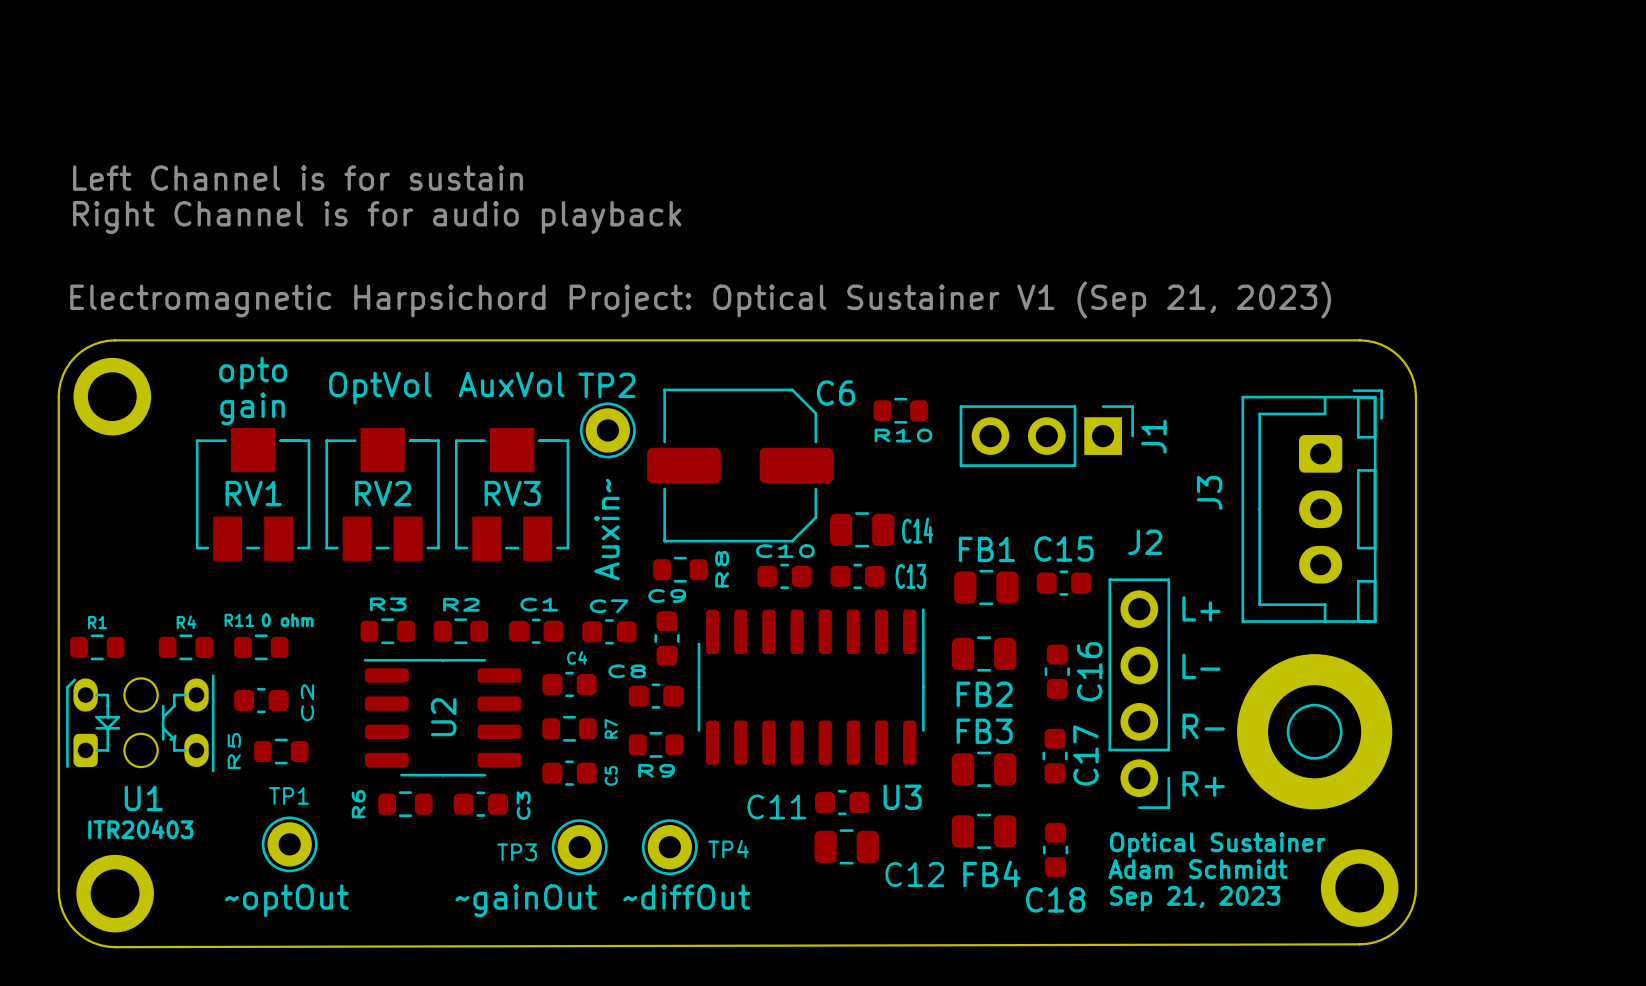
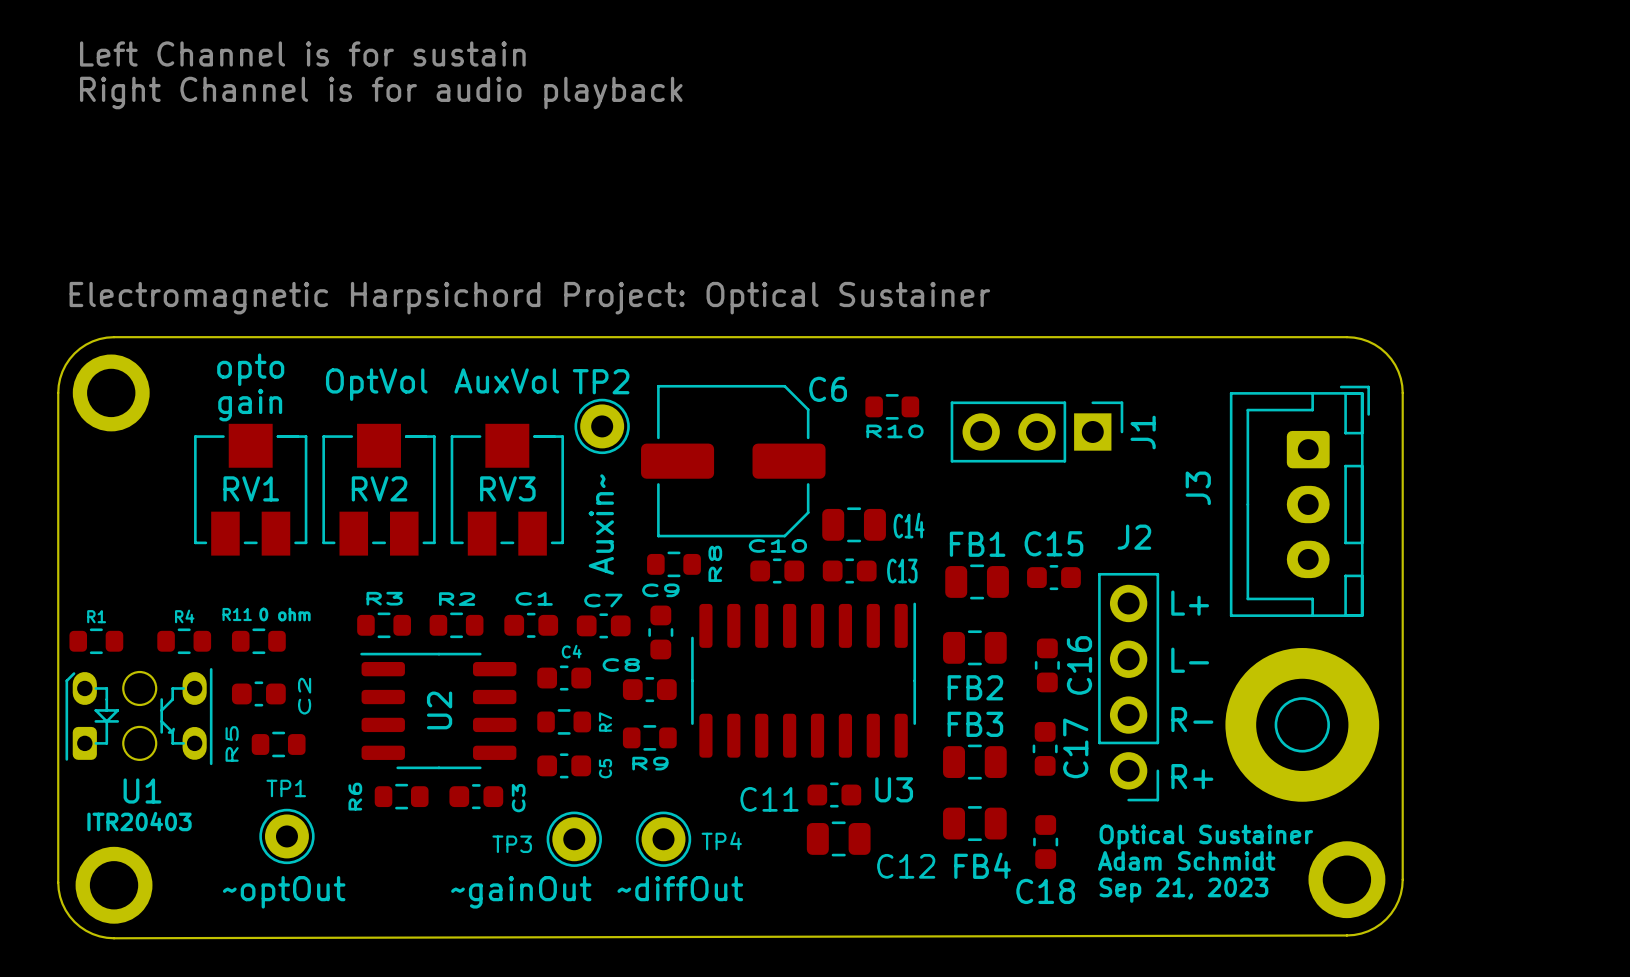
text position: Left Channel is for sustain (298, 178) -> Left Channel is for sustain (302, 53)
text position: Right Channel is for audio playback (377, 217) -> Right Channel is for audio playback (381, 92)
text: Electromagnetic Harpsichord Project: Optical Sustainer V1 (Sep 21, 2023) (700, 299) -> Electromagnetic Harpsichord Project: Optical Sustainer (529, 298)

